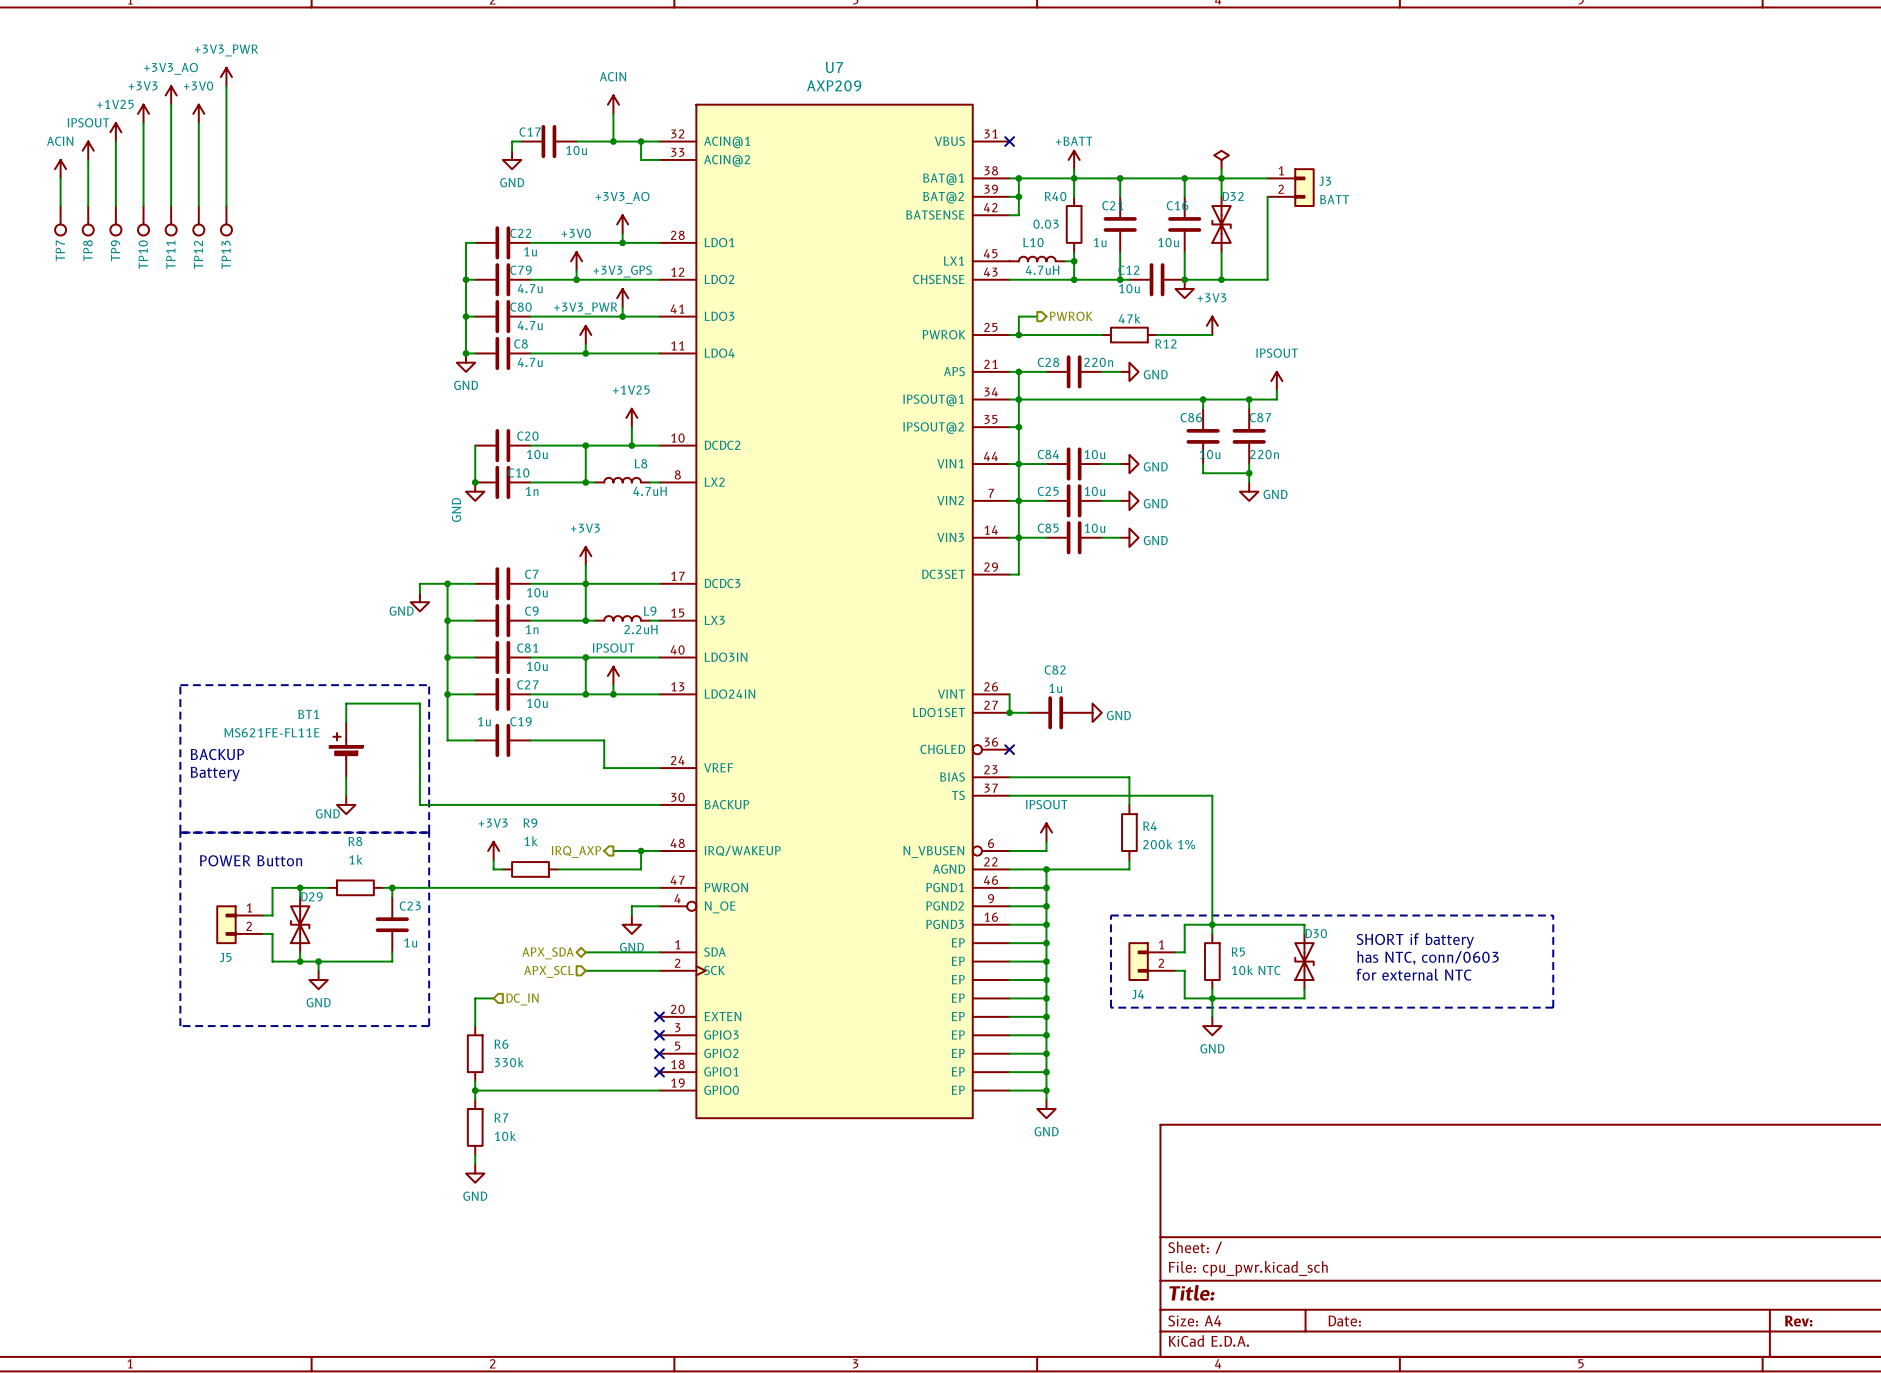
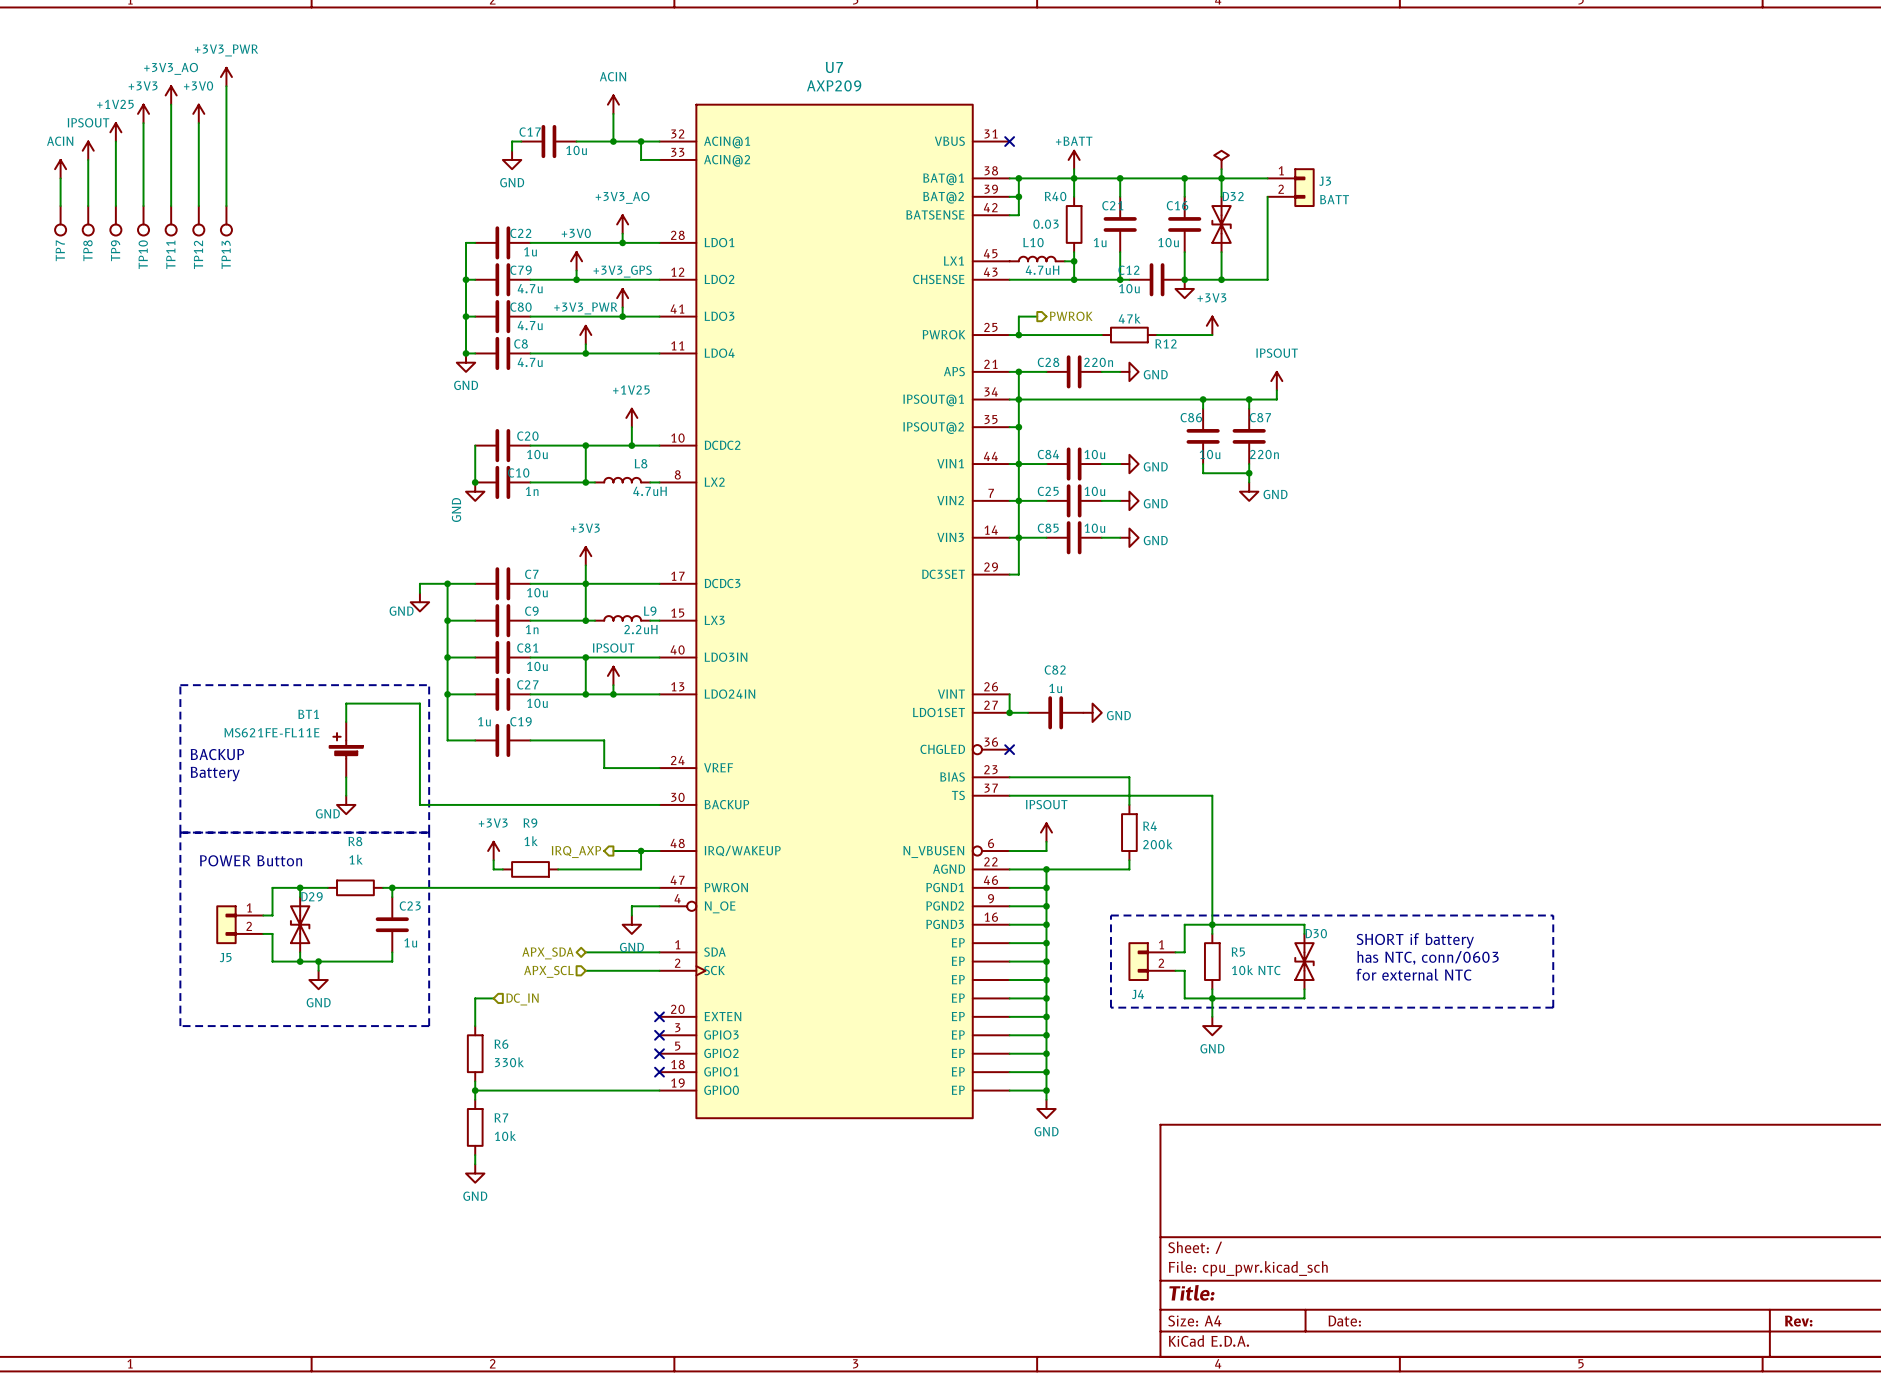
R4 value: 200k 1% (1169, 844) -> 200k (1157, 844)

